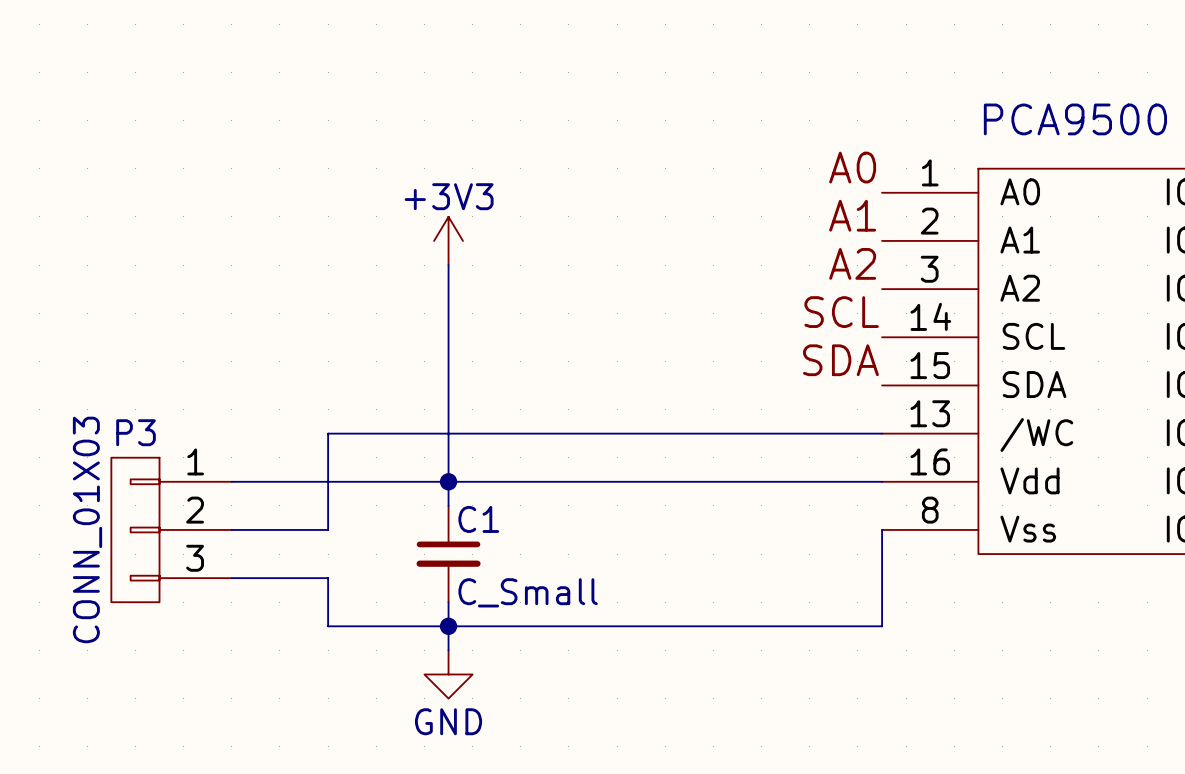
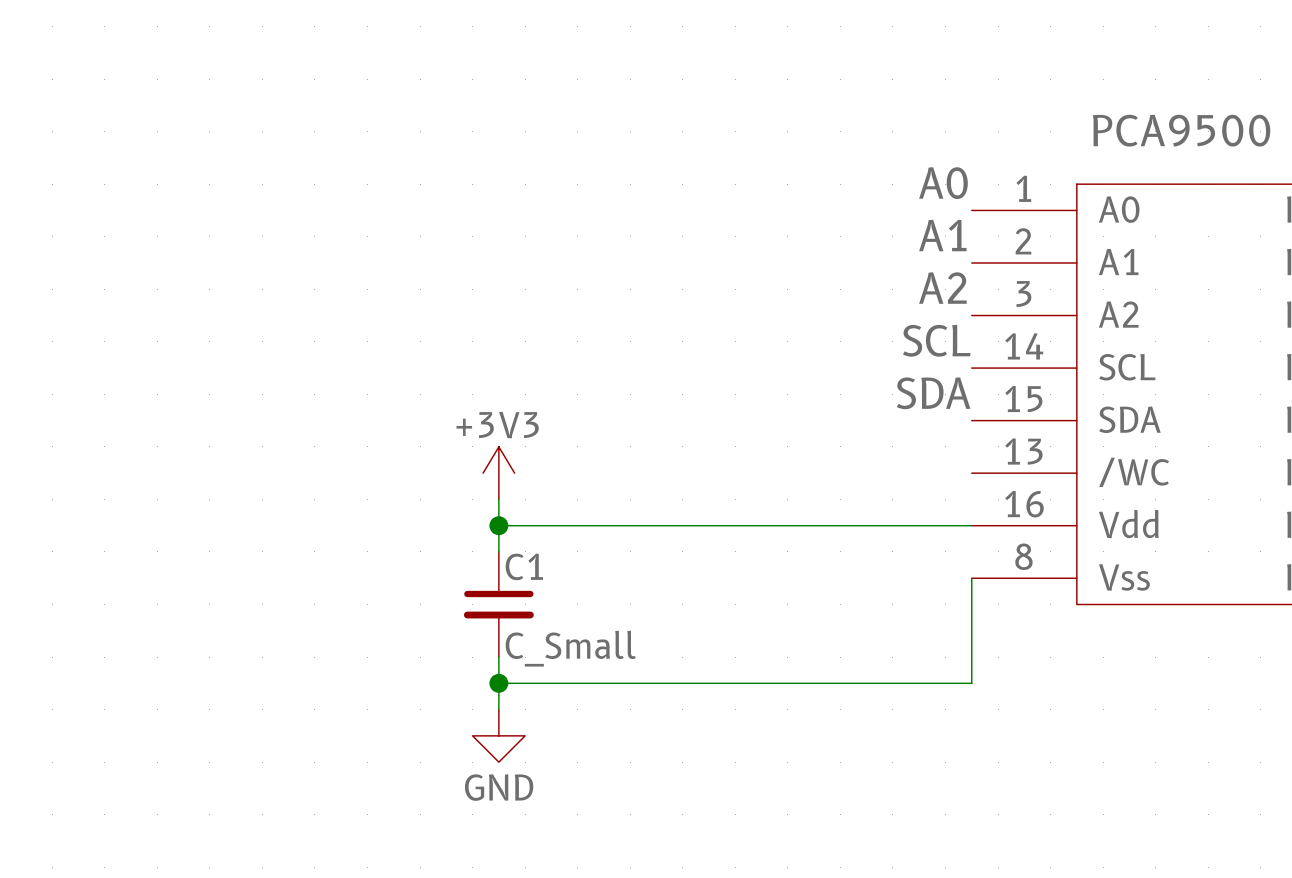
power symbol position: +3V3 (448, 240) -> +3V3 (498, 473)
wire: (448, 265) (448, 457) -> none
wire: (882, 433) (328, 433) (328, 529) (231, 529) -> none
wire: (231, 481) (448, 481) -> none
P3: CONN_01X03 (171, 529) -> none
wire: (231, 578) (328, 578) (328, 626) (448, 626) -> none

